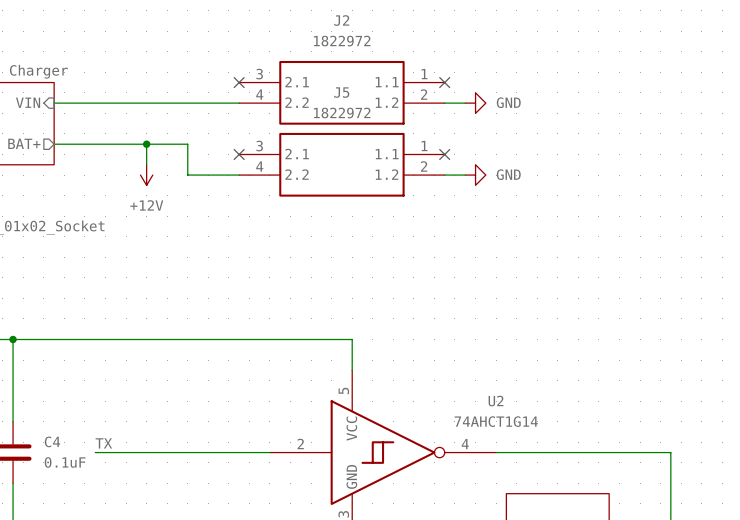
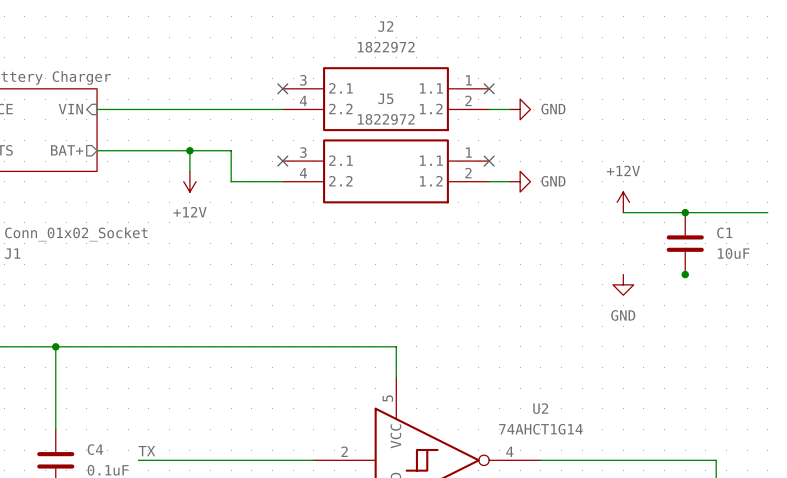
power symbol: none -> +12V (623, 202)
wire: none -> (623, 212) (767, 212)
junction: none -> (685, 212)
C1: none -> 10uF (685, 243)
junction: none -> (685, 274)
power symbol: none -> GND (623, 284)

